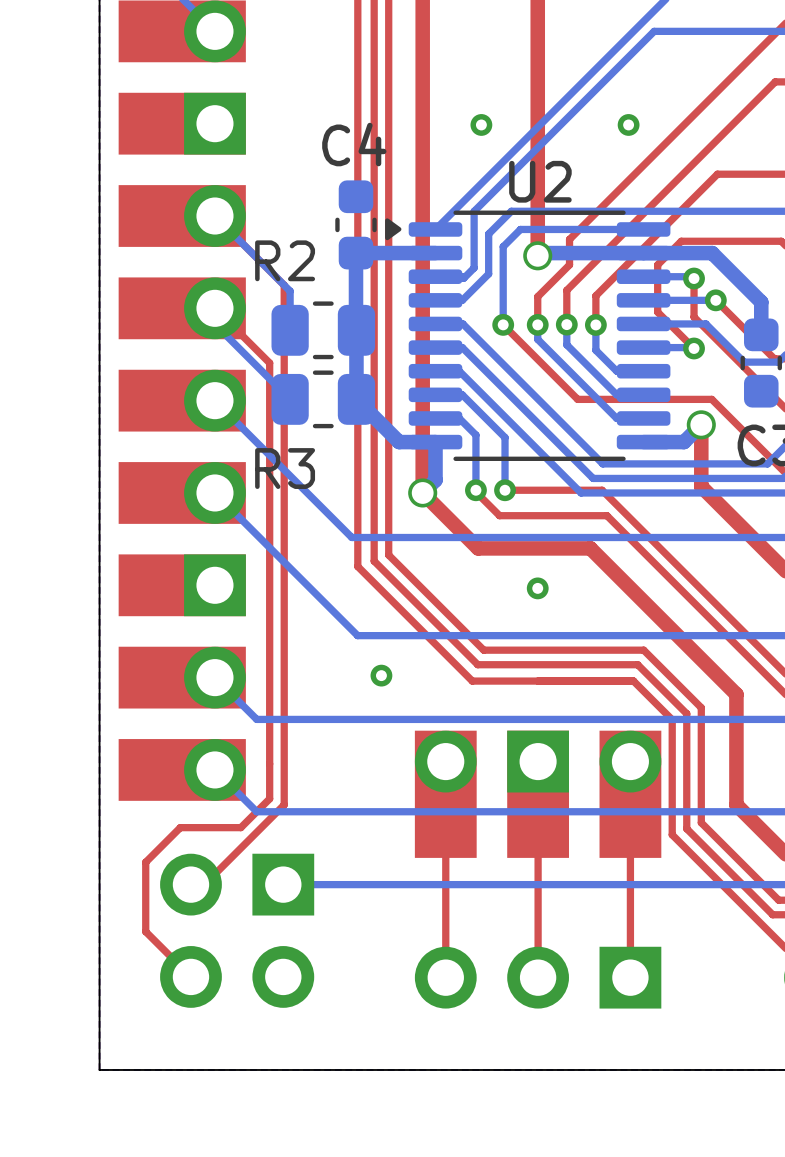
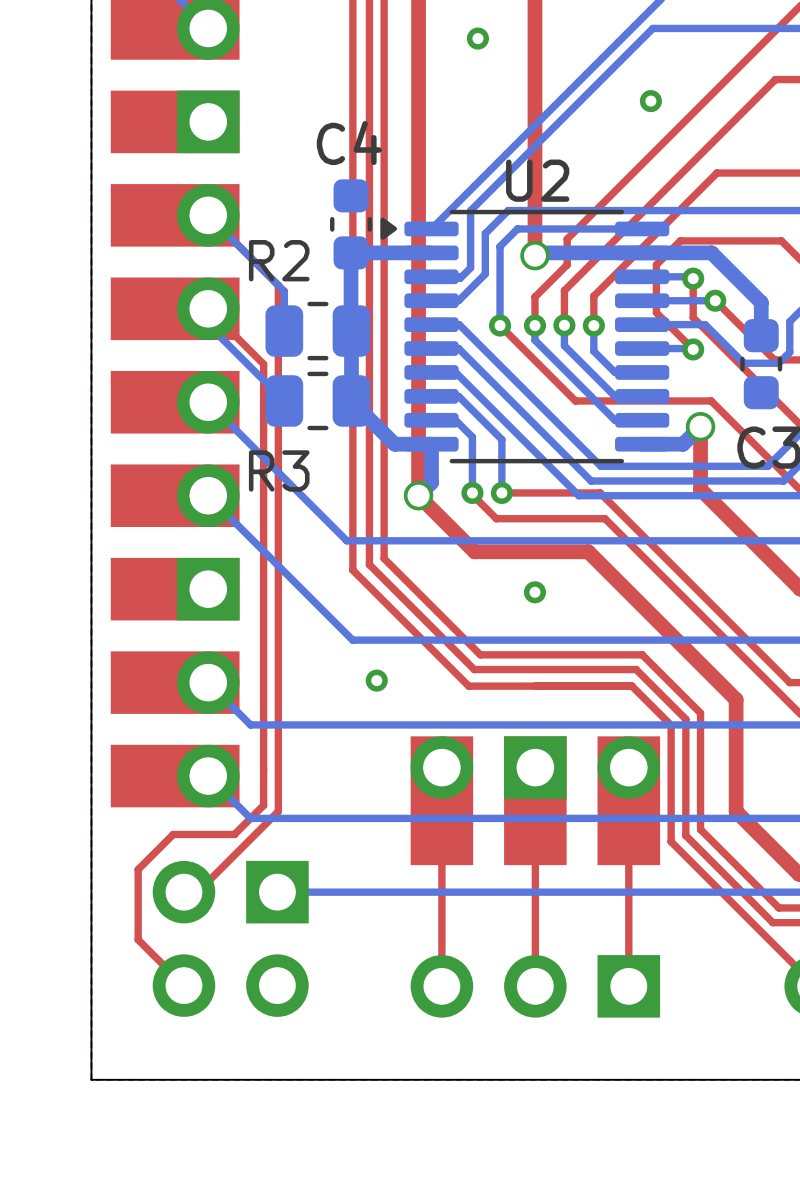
via position: (481, 124) -> (477, 38)
via position: (628, 124) -> (650, 101)

